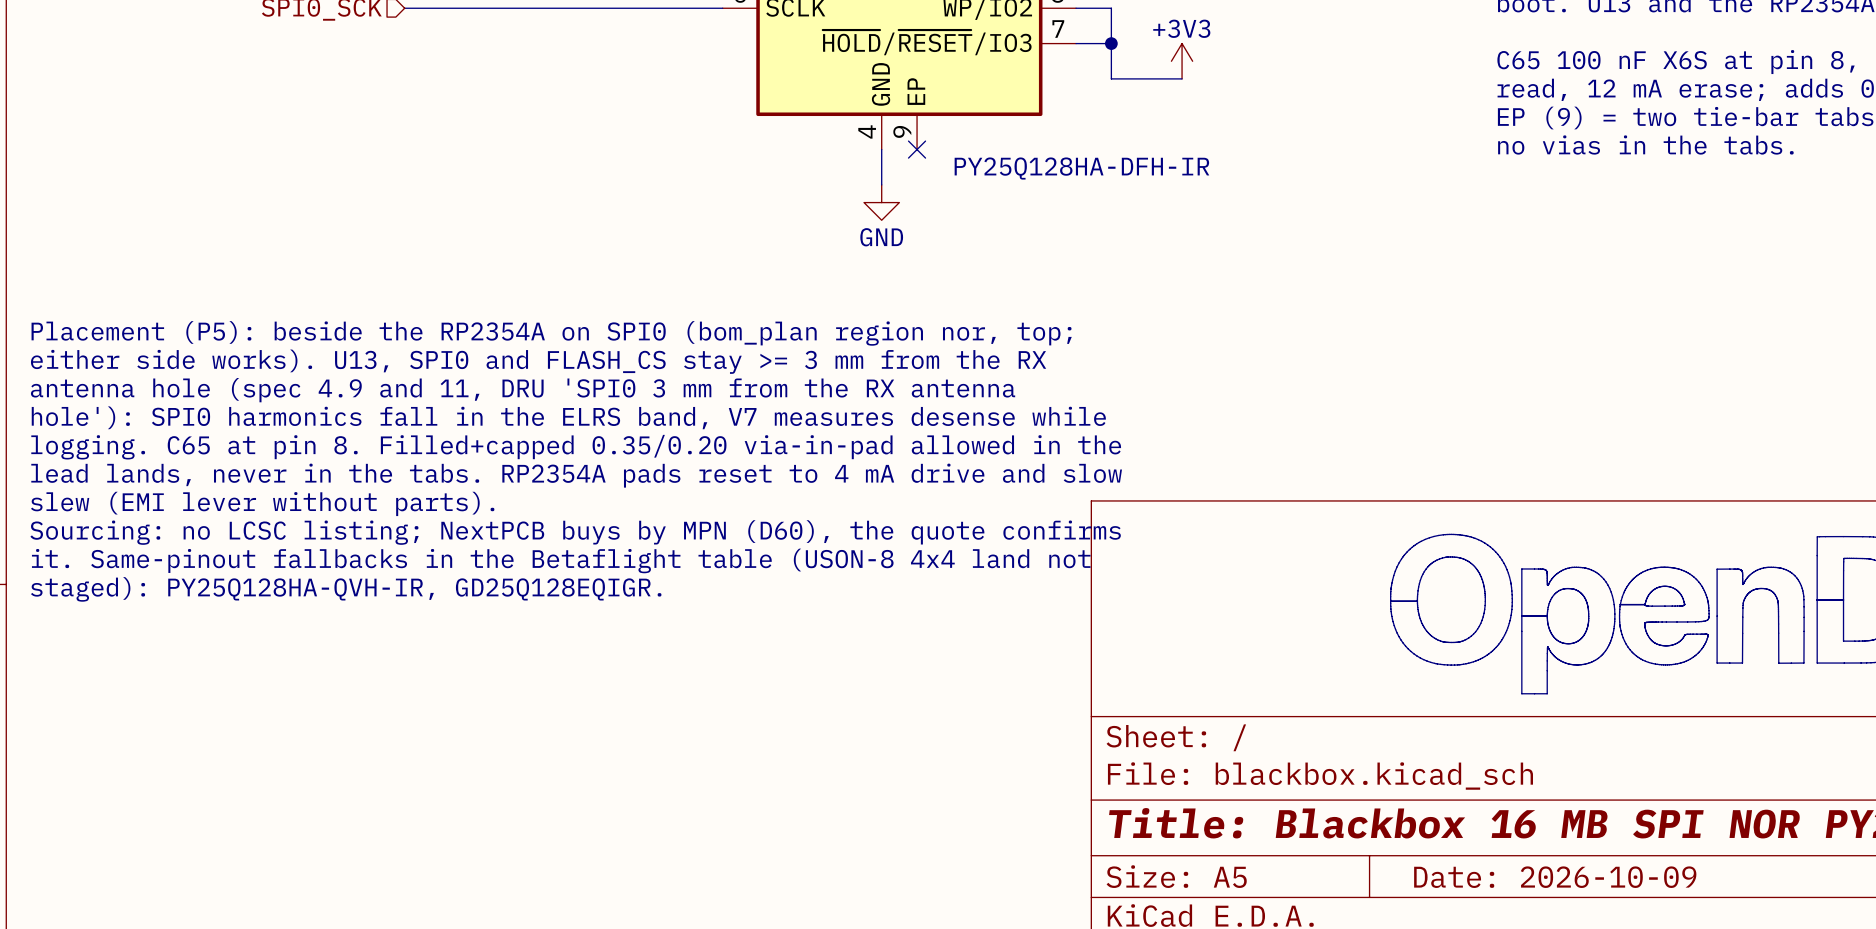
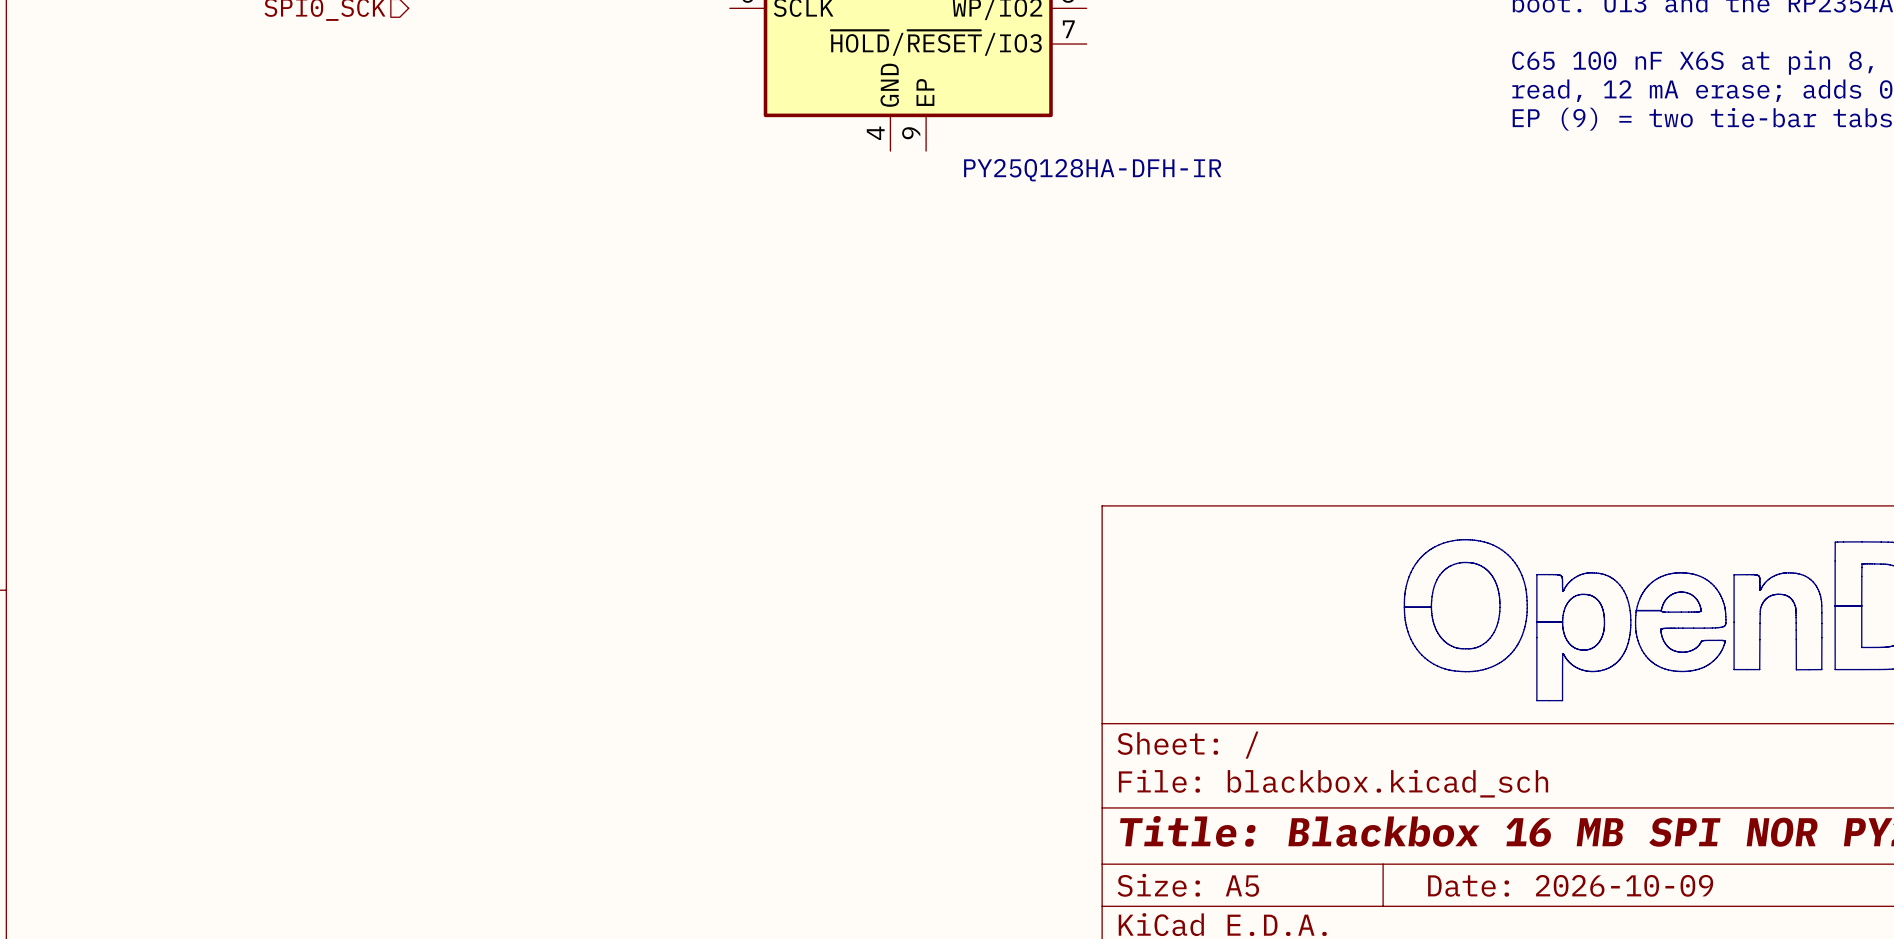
wire: (404, 8) (722, 8) -> none
wire: (1076, 8) (1111, 8) (1111, 78) (1182, 78) -> none
wire: (1076, 43) (1111, 43) -> none
junction: (1111, 43) -> none
power symbol: +3V3 (1182, 61) -> none
text: no vias in the tabs. (1645, 145) -> none
wire: (881, 149) (881, 184) -> none
no-connect mark: (917, 149) -> none
power symbol: GND (881, 202) -> none
text: Placement (P5): beside the RP2354A on SPI0 (bom_plan region nor, top; (551, 333) -> none
text: either side works). U13, SPI0 and FLASH_CS stay >= 3 mm from the RX (538, 361) -> none
text: antenna hole (spec 4.9 and 11, DRU 'SPI0 3 mm from the RX antenna (523, 390) -> none
text: hole'): SPI0 harmonics fall in the ELRS band, V7 measures desense while (568, 417) -> none
text: logging. C65 at pin 8. Filled+capped 0.35/0.20 via-in-pad allowed in the (576, 447) -> none
text: lead lands, never in the tabs. RP2354A pads reset to 4 mA drive and slow (576, 475) -> none
text: slew (EMI lever without parts). (262, 503) -> none
text: Sourcing: no LCSC listing; NextPCB buys by MPN (D60), the quote confirms (575, 532) -> none
text: it. Same-pinout fallbacks in the Betaflight table (USON-8 4x4 land not (561, 560) -> none
text: staged): PY25Q128HA-QVH-IR, GD25Q128EQIGR. (346, 589) -> none

